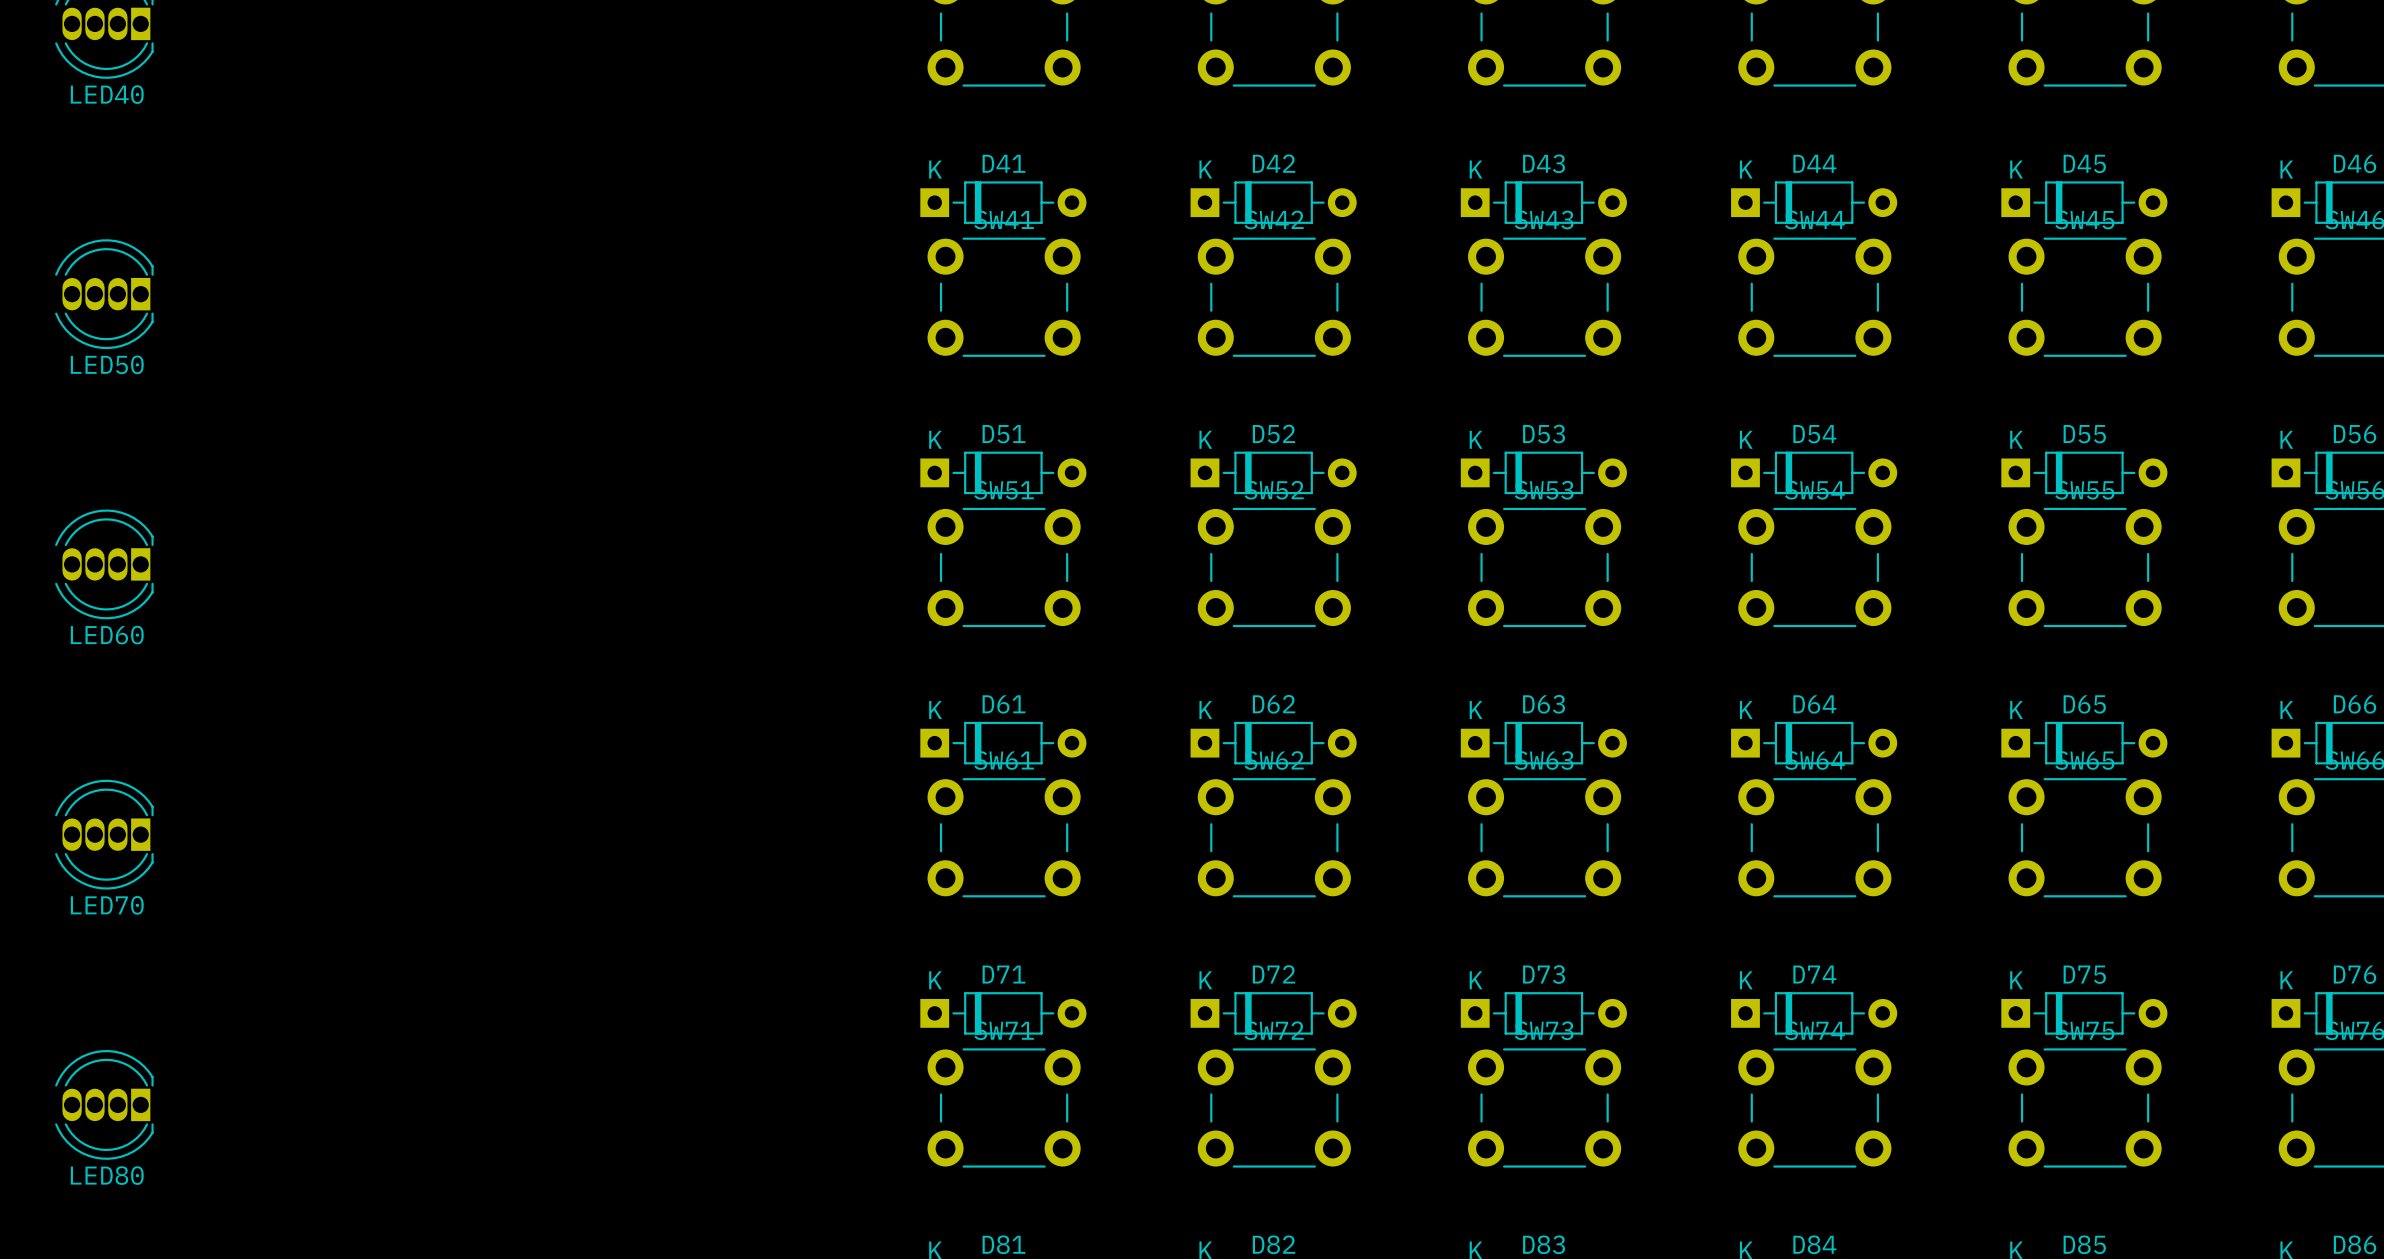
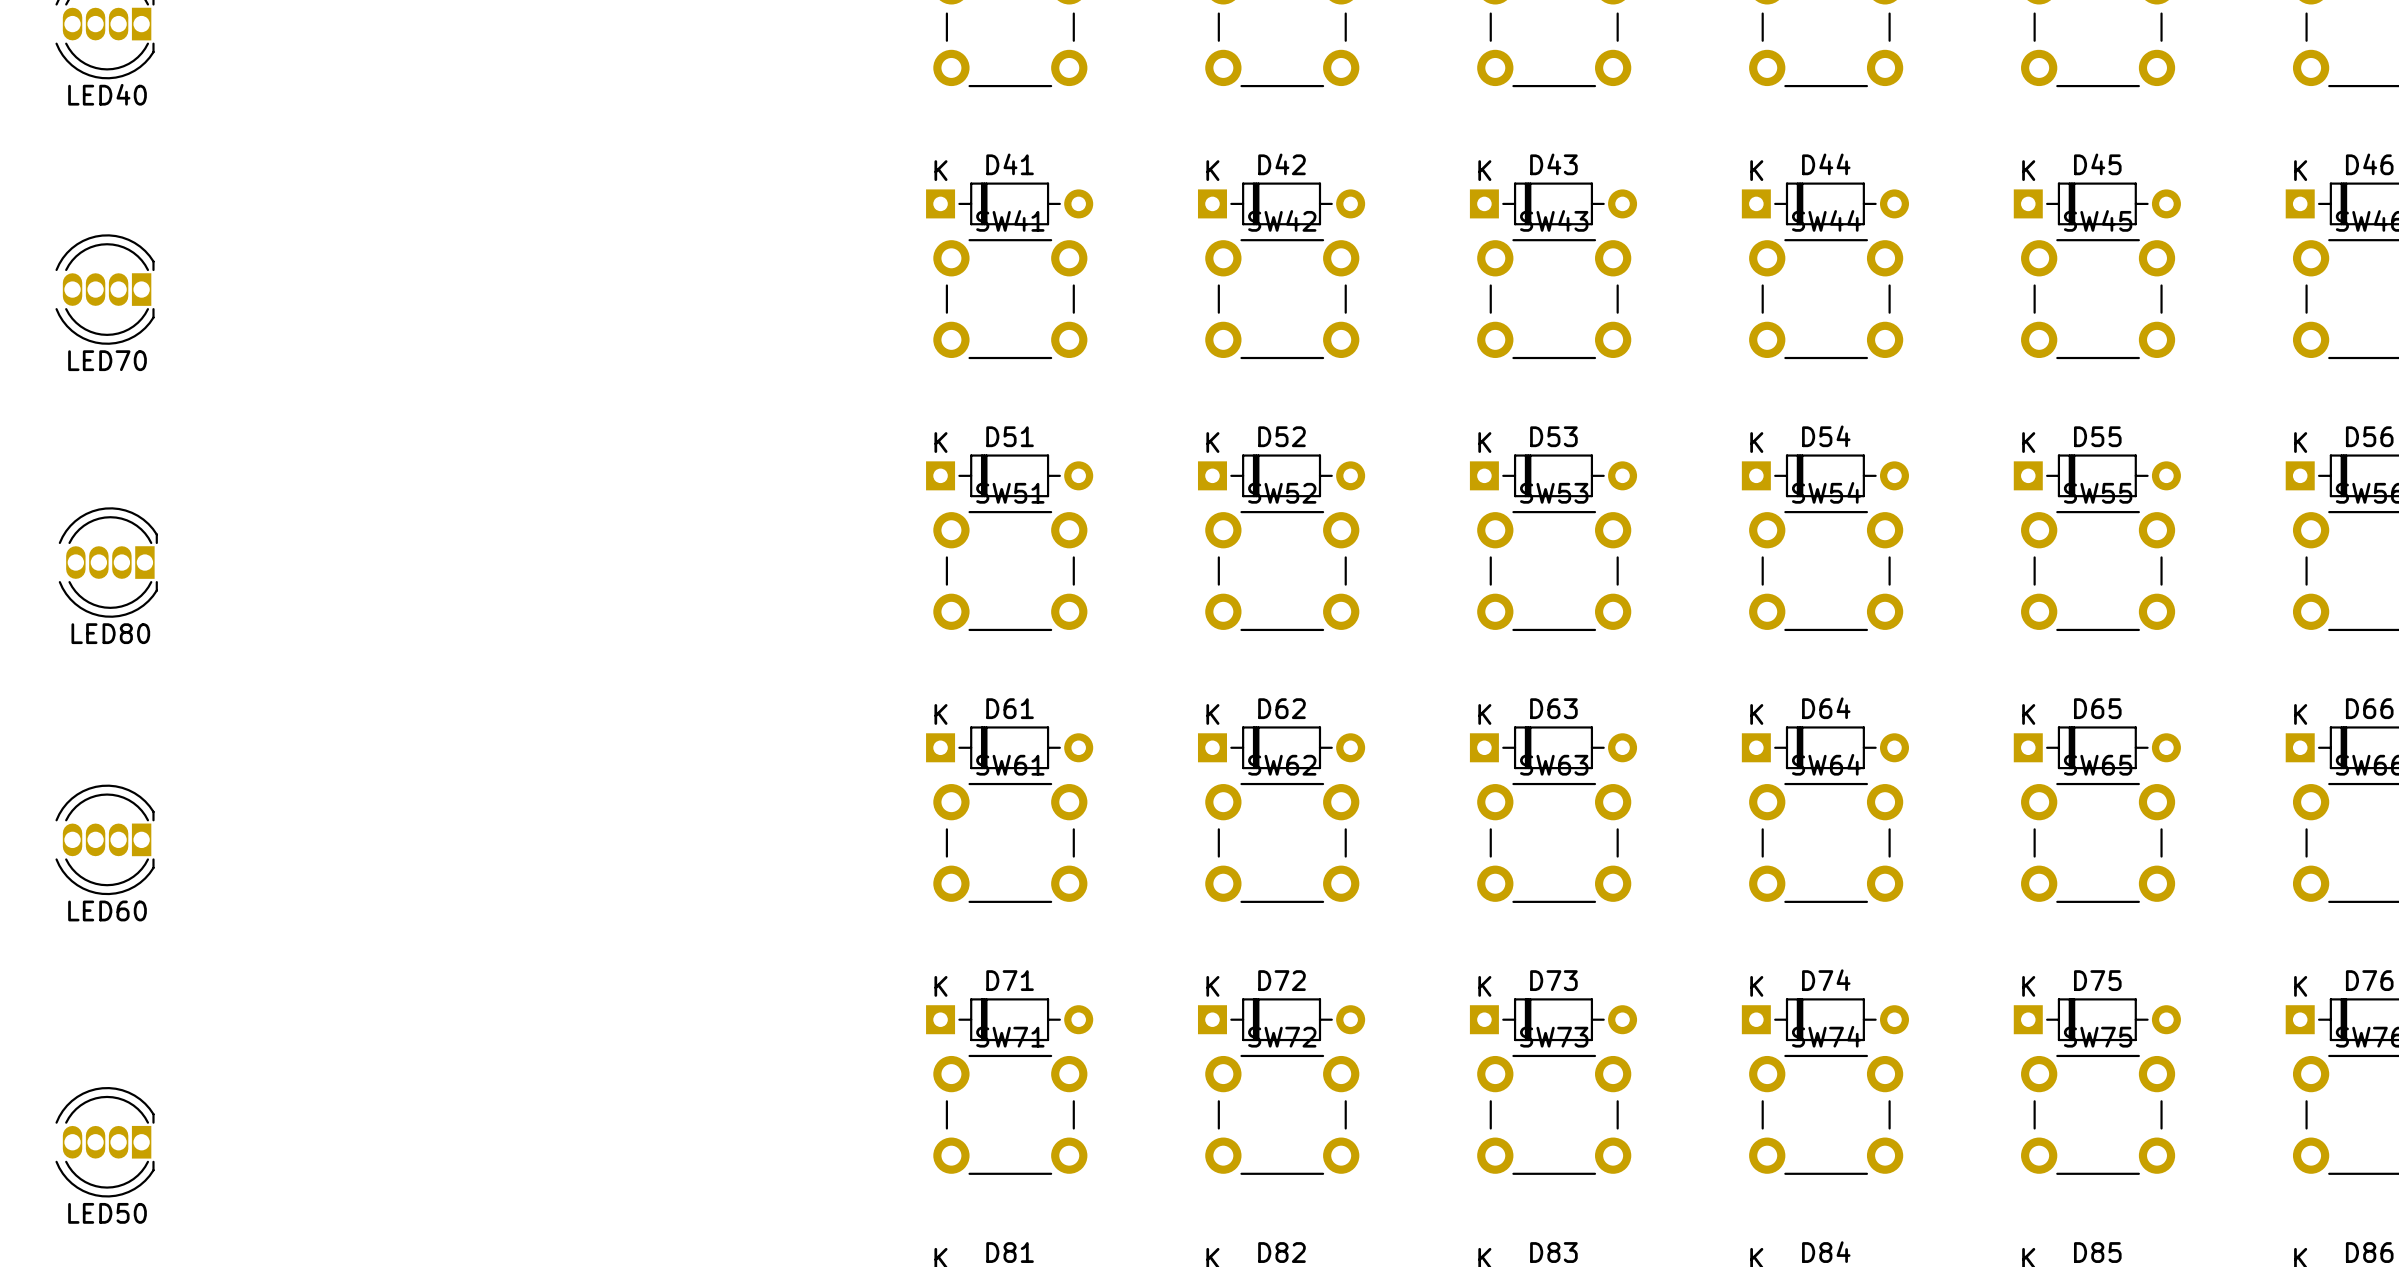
LED70: none -> (105, 289)
LED50 position: (104, 294) -> (105, 1142)
LED60: (104, 564) -> none
LED70 name: LED70 (107, 905) -> LED60 (107, 910)
LED80 position: (104, 1104) -> (108, 562)

